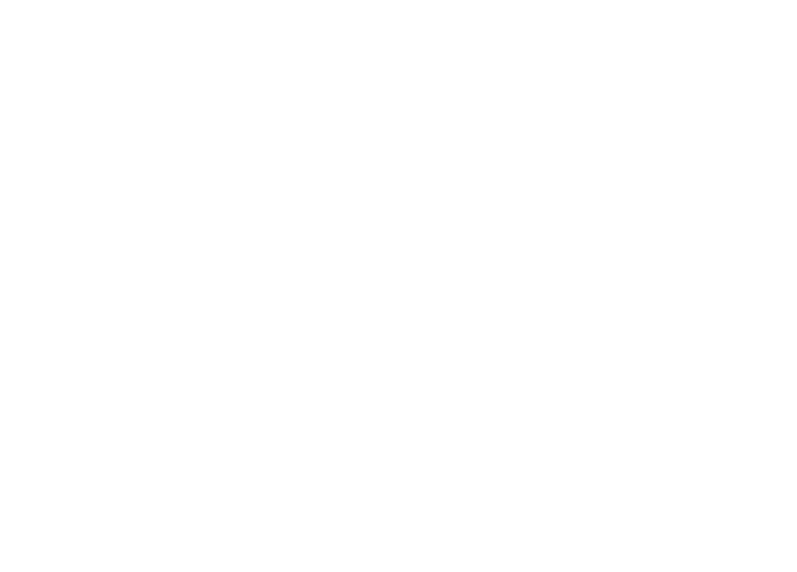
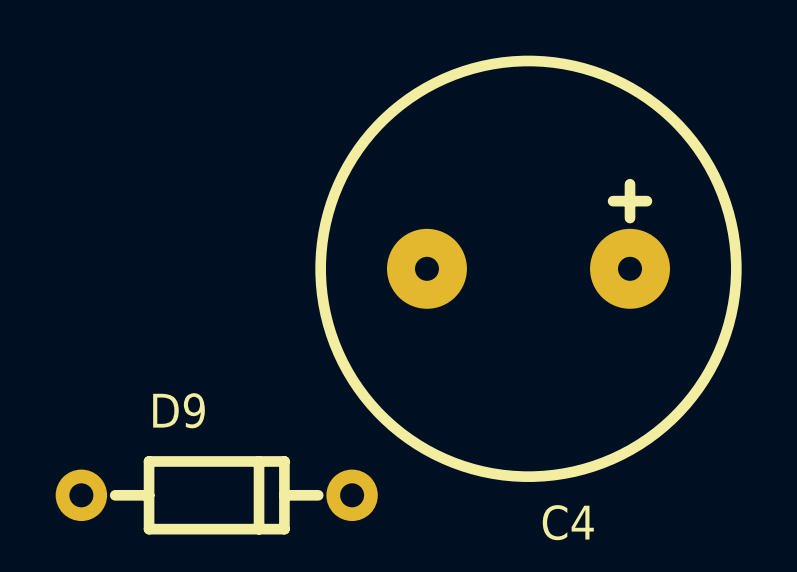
C4: none -> (528, 268)
D9: none -> (216, 495)

